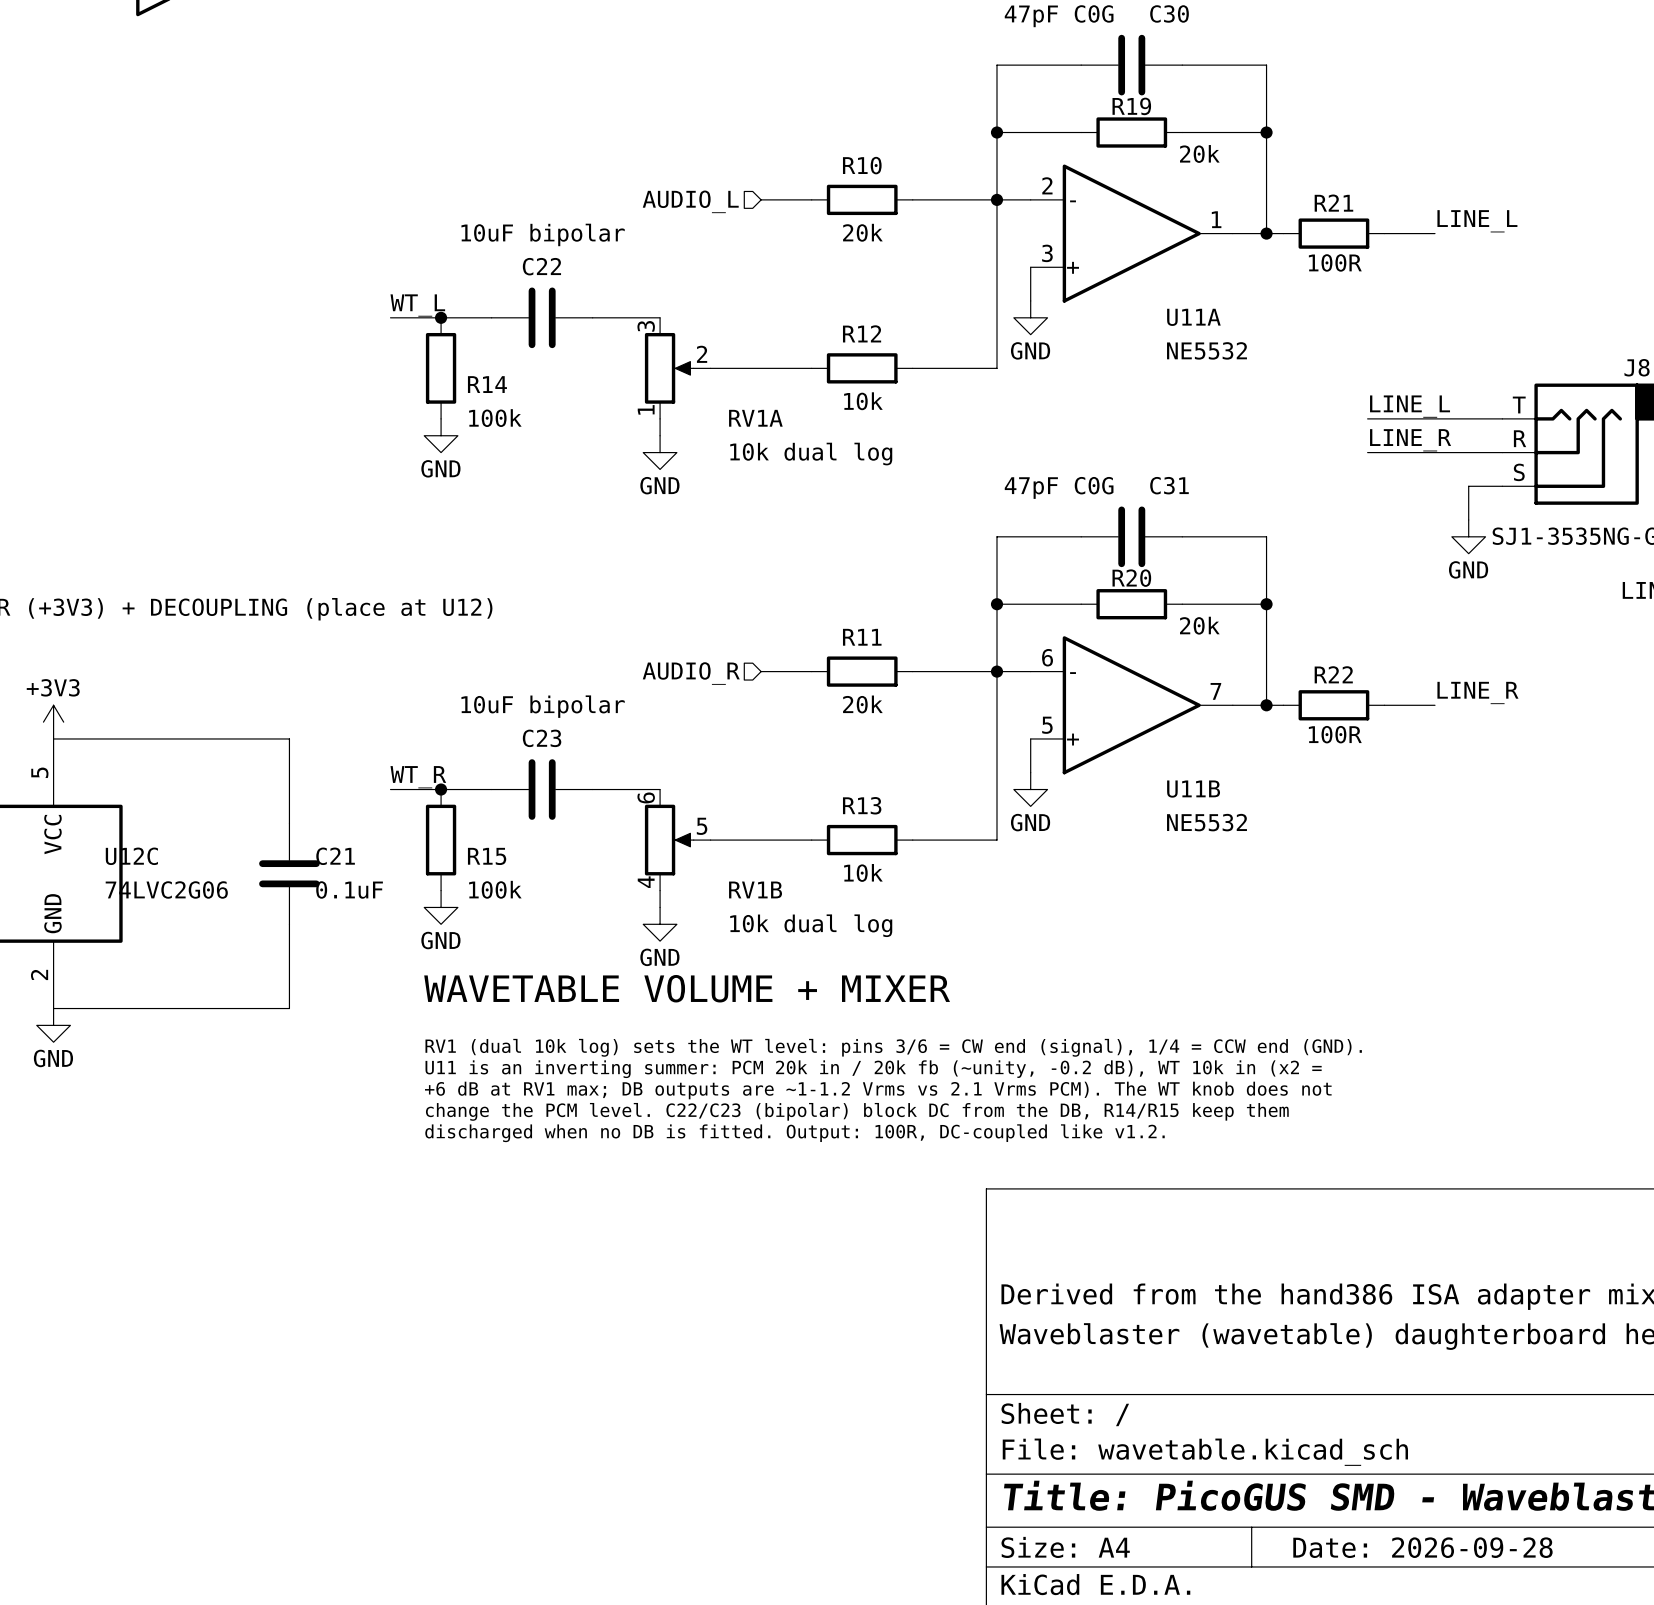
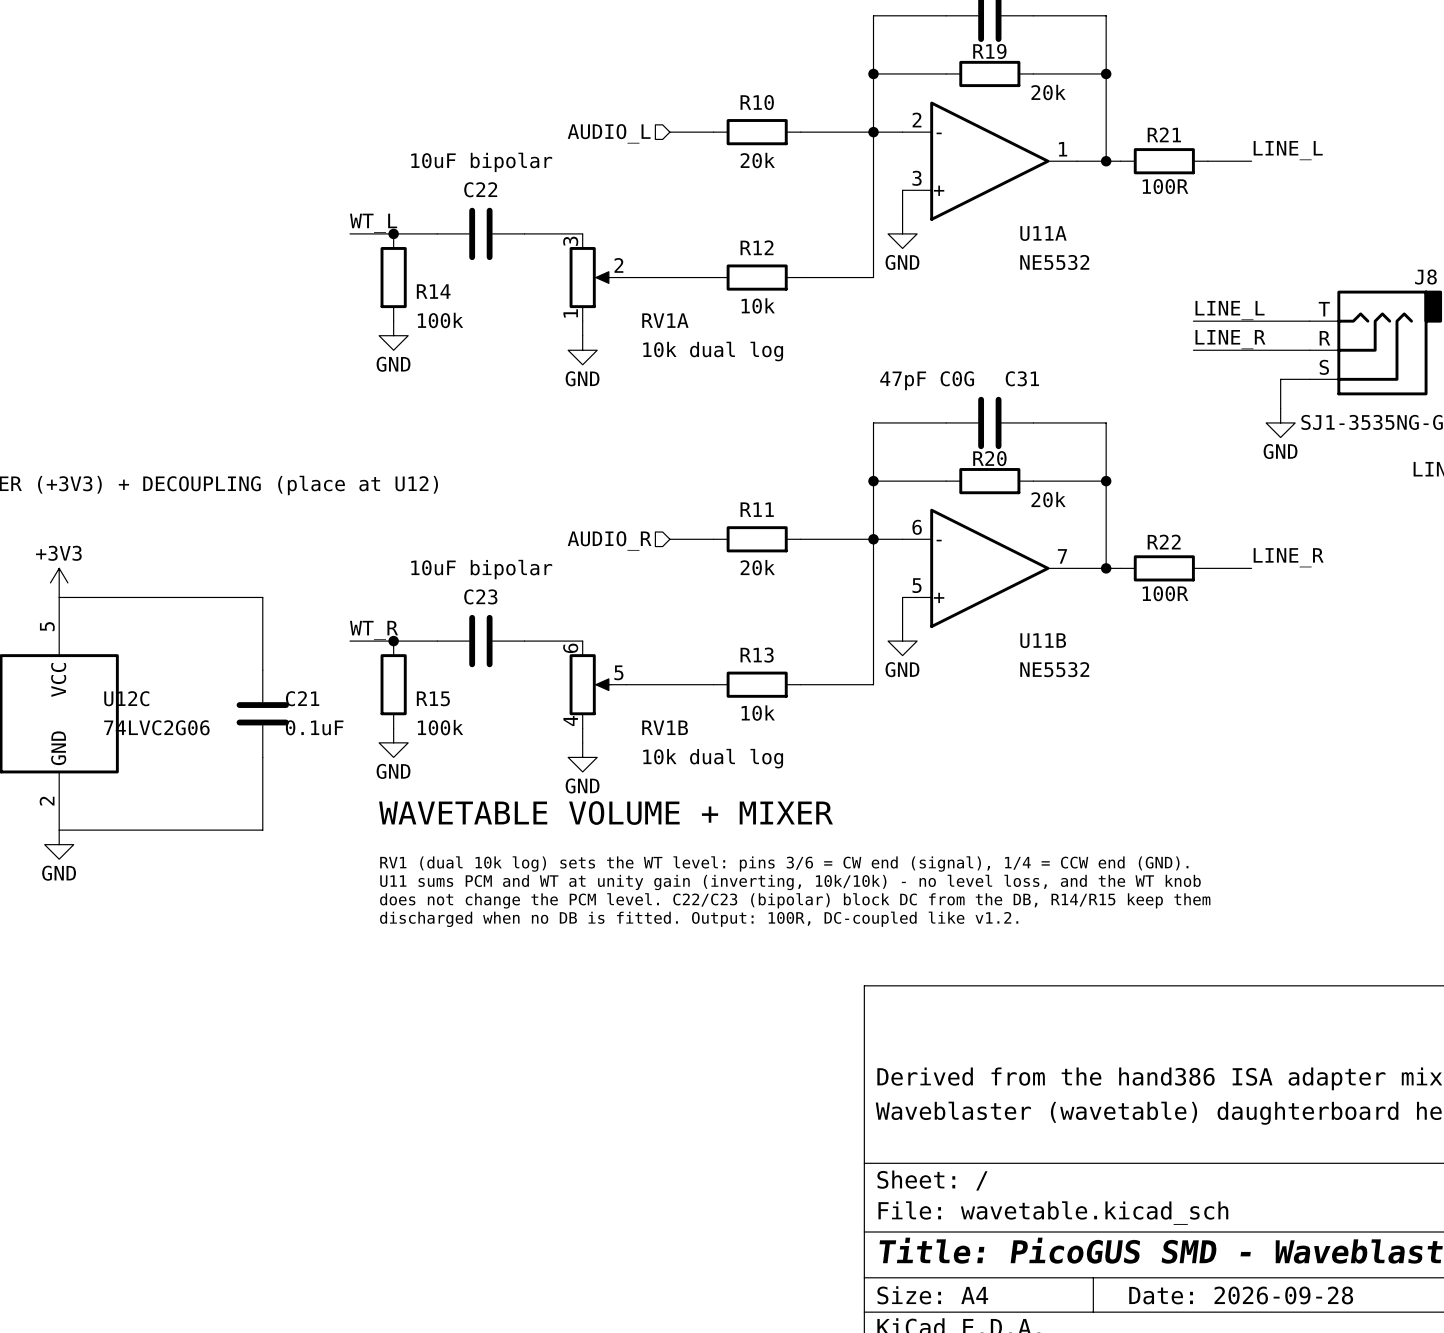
text: U11 is an inverting summer: PCM 20k in / 20k fb (~unity, -0.2 dB), WT 10k in (x2 = (873, 1069) -> U11 sums PCM and WT at unity gain (inverting, 10k/10k) - no level loss, and the WT knob (790, 882)
text: +6 dB at RV1 max; DB outputs are ~1-1.2 Vrms vs 2.1 Vrms PCM). The WT knob does not (878, 1090) -> does not change the PCM level. C22/C23 (bipolar) block DC from the DB, R14/R15 keep them (795, 900)
text: change the PCM level. C22/C23 (bipolar) block DC from the DB, R14/R15 keep them (857, 1111) -> discharged when no DB is fitted. Output: 100R, DC-coupled like v1.2. (699, 919)
text: discharged when no DB is fitted. Output: 100R, DC-coupled like v1.2. (795, 1133) -> none

